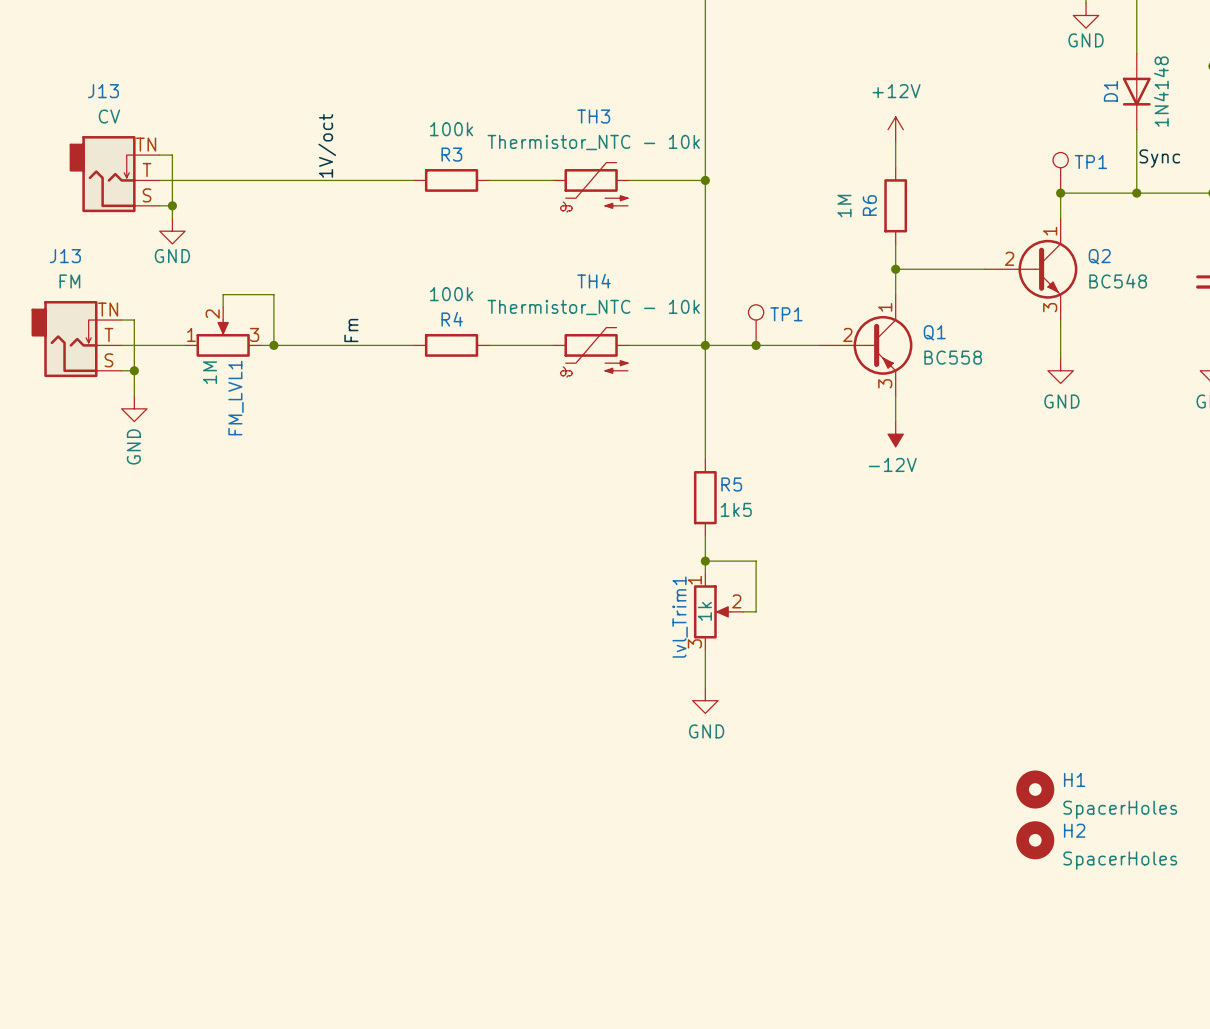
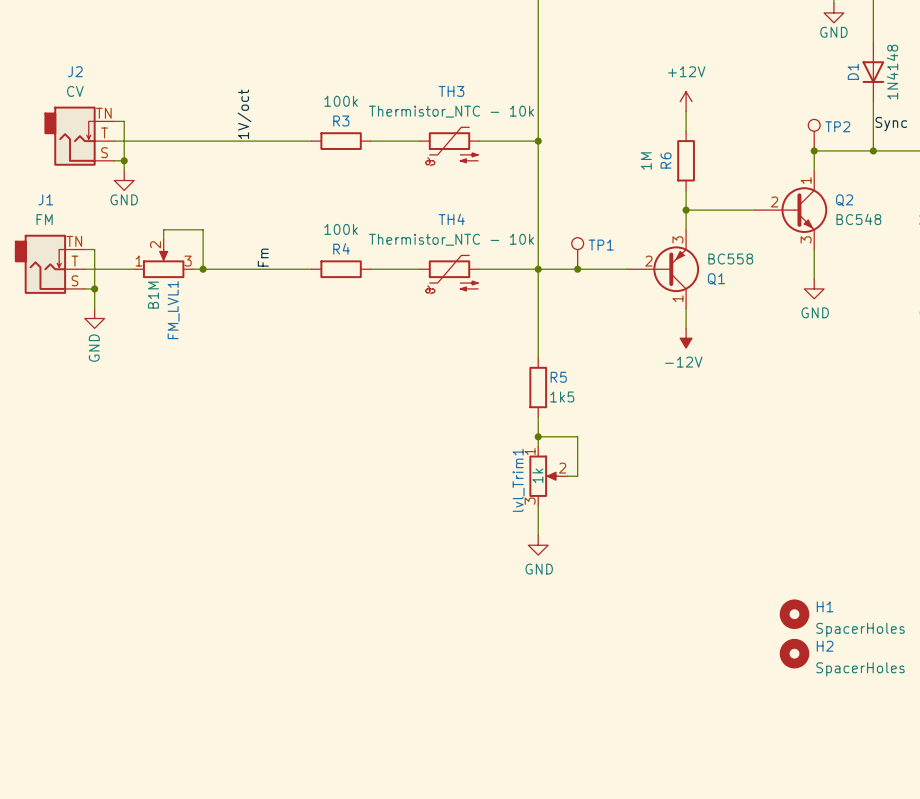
J13 name: J13 (103, 91) -> J2 (75, 71)
TP1 name: TP1 (1090, 162) -> TP2 (837, 126)
J13 name: J13 (65, 256) -> J1 (45, 199)
Q1 flip: as is (882, 345) -> up-down (676, 269)
FM_LVL1 value: 1M (210, 372) -> B1M (153, 295)

